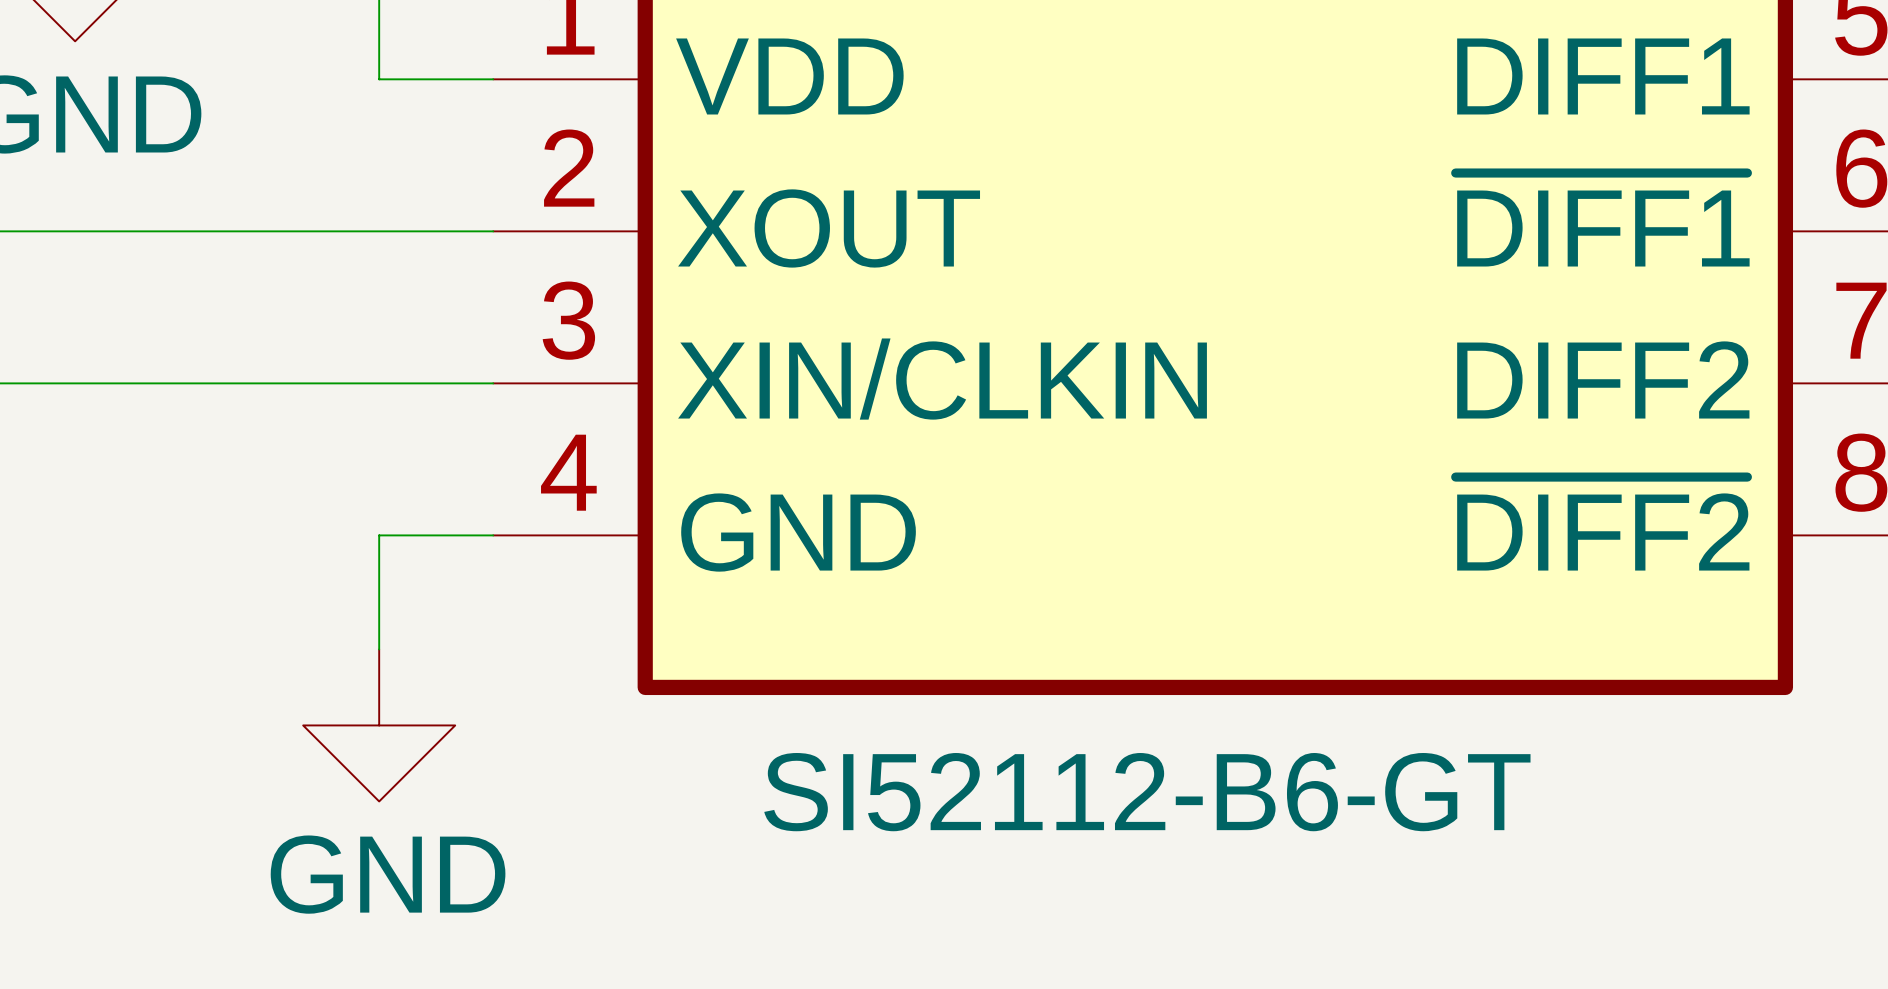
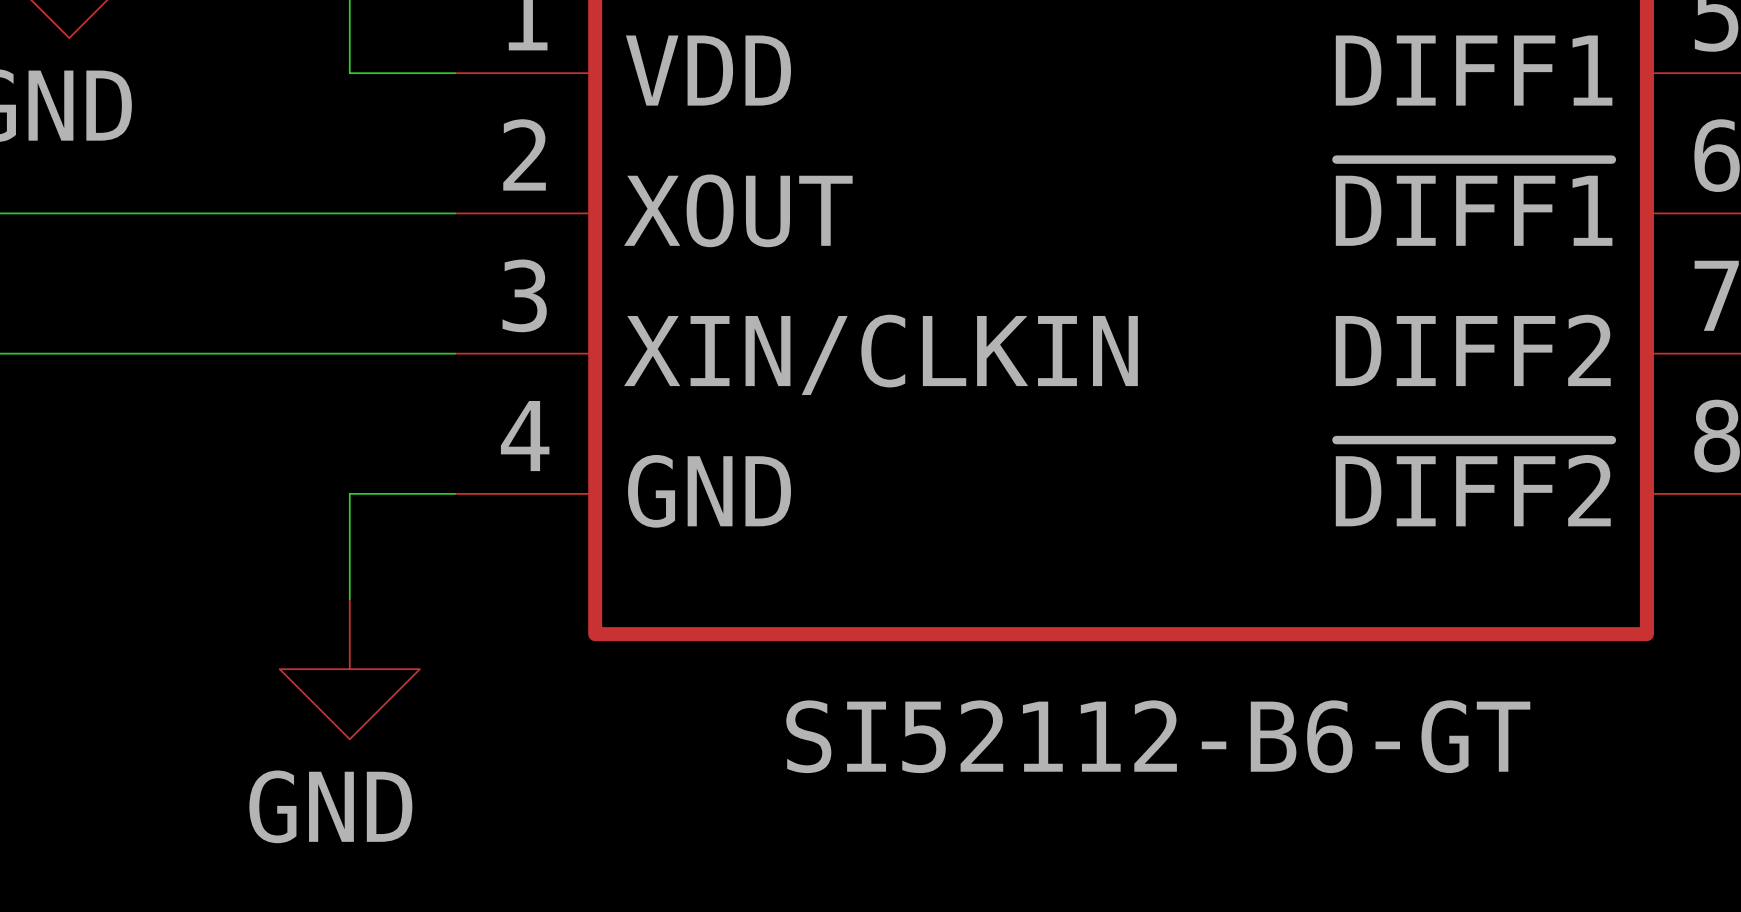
part value position: SI52112-B6-GT (1147, 792) -> SI52112-B6-GT (1158, 736)

